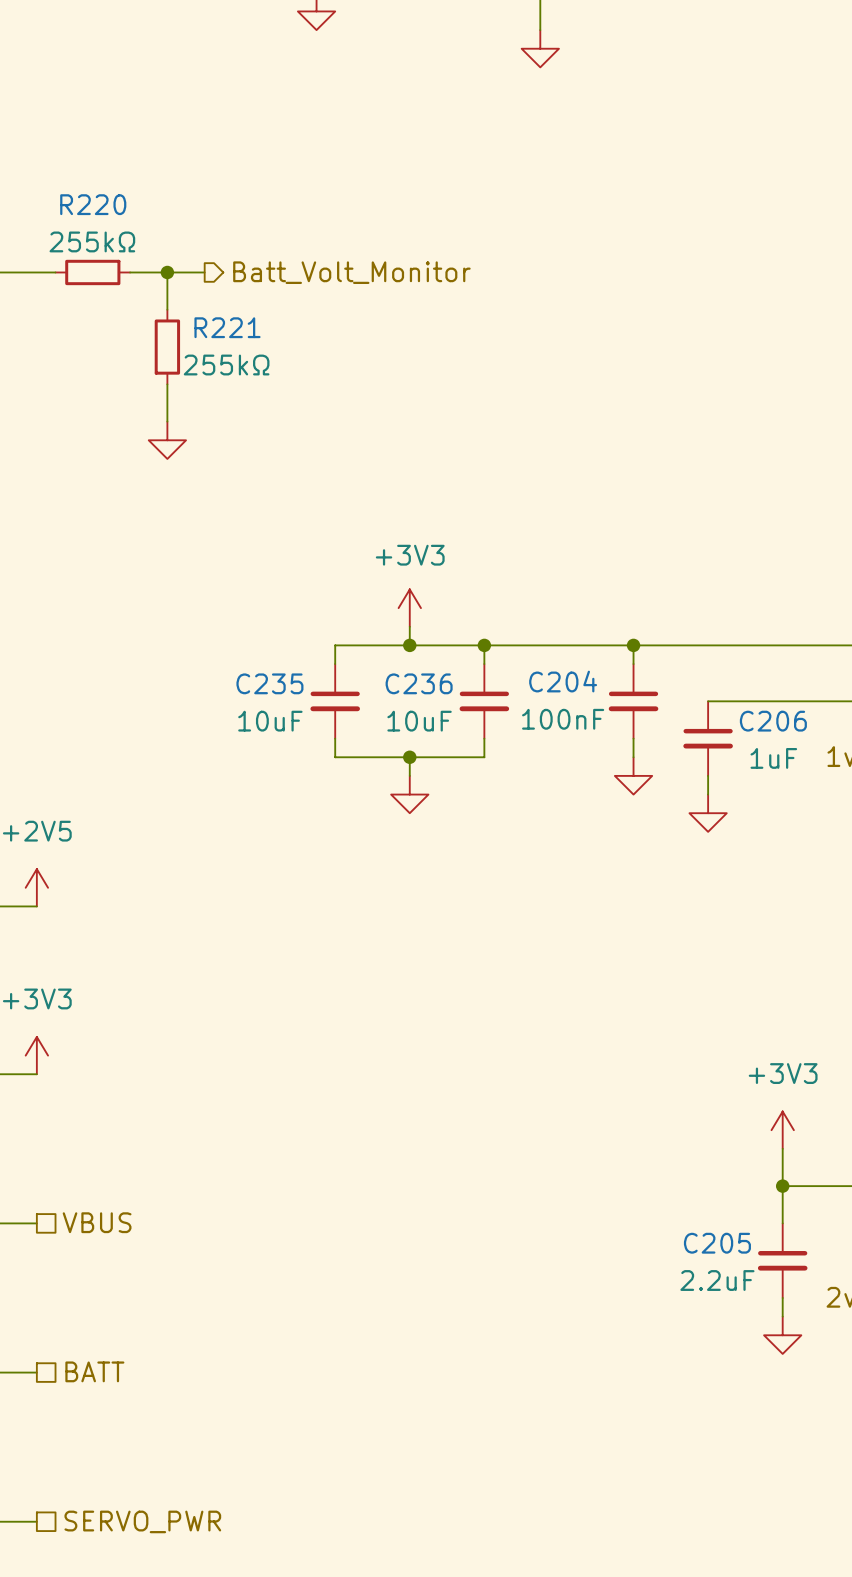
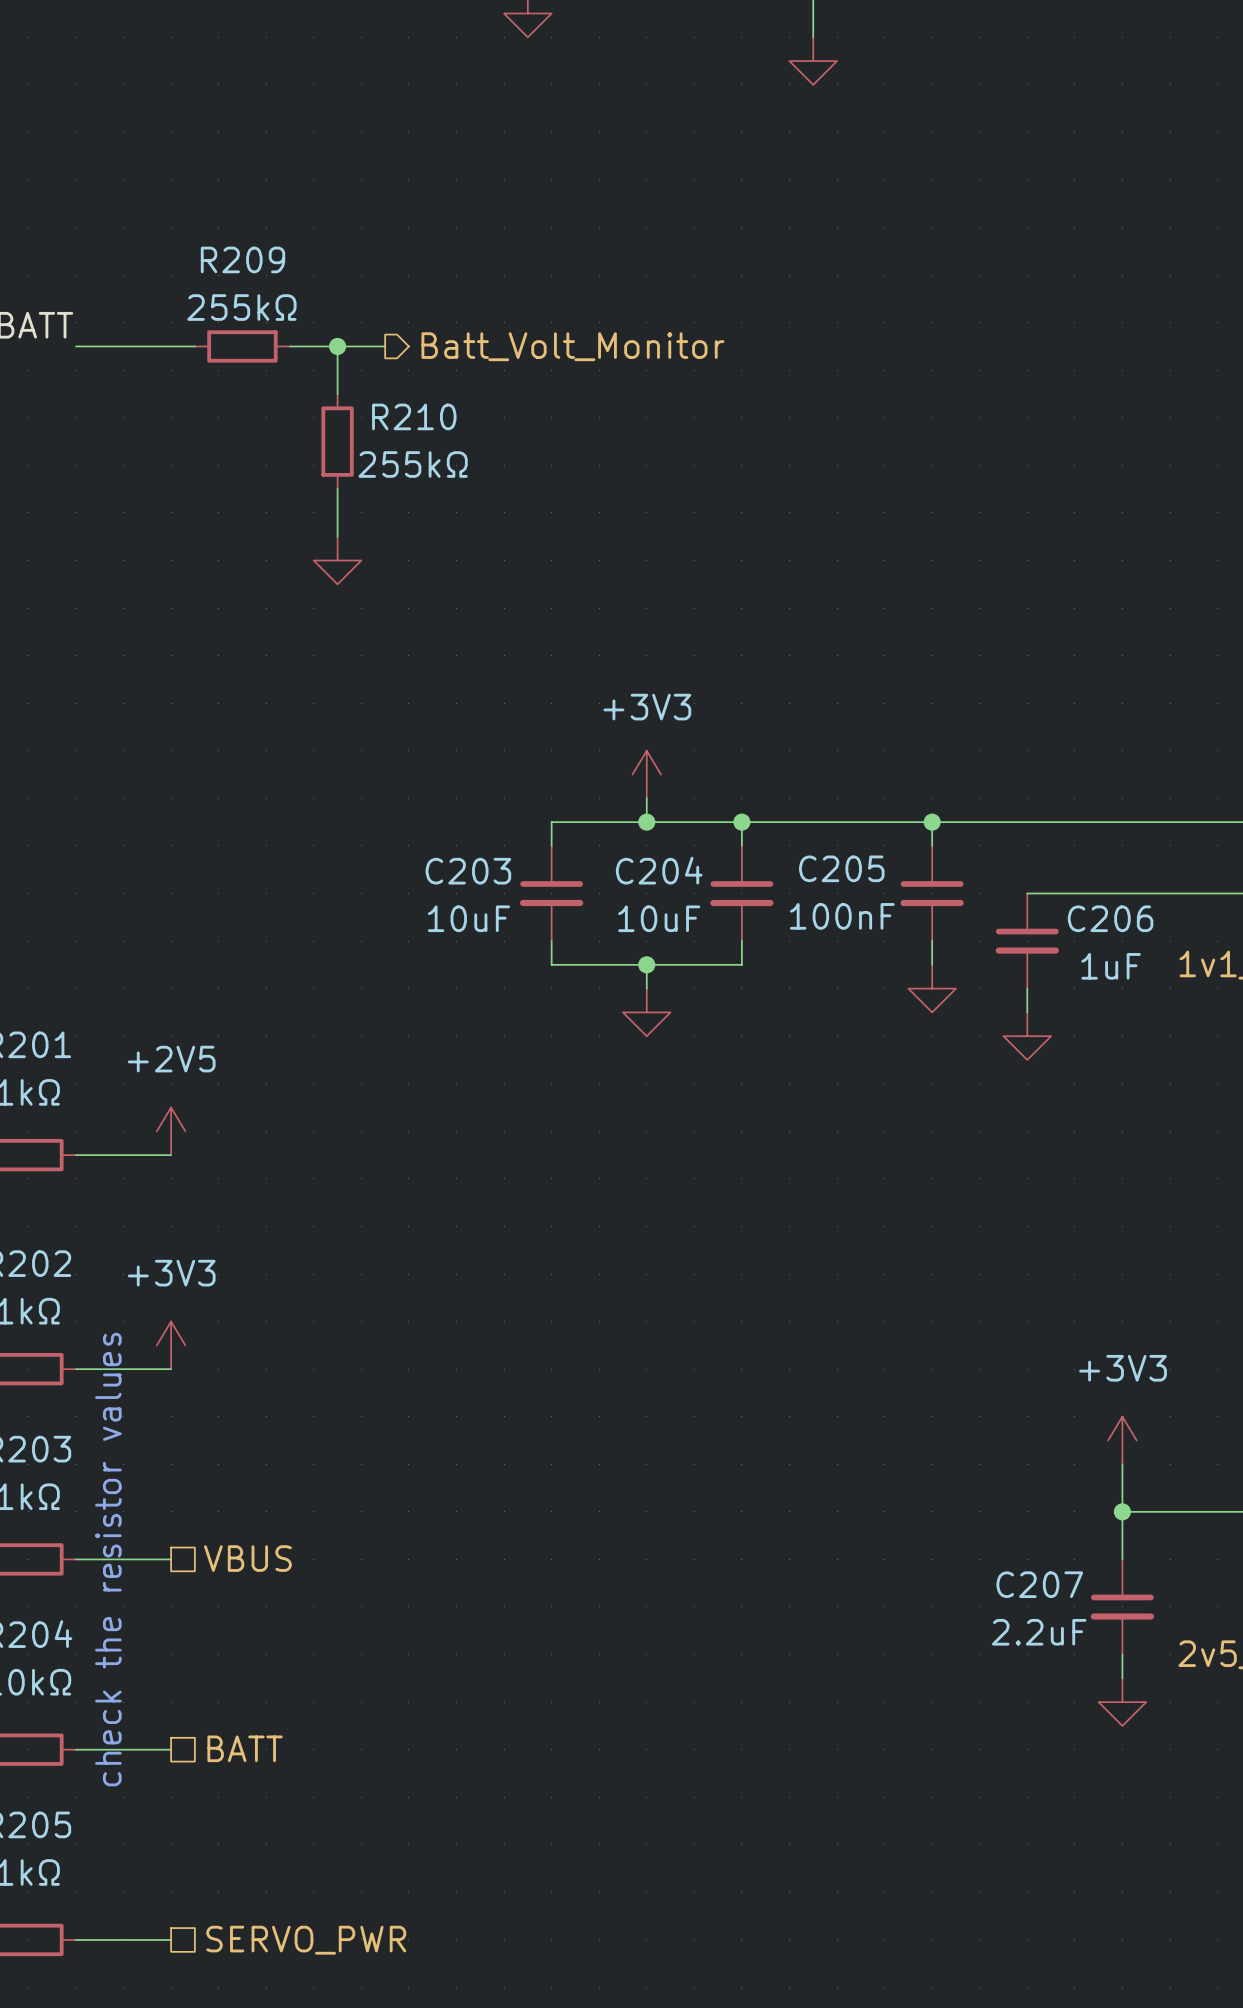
R220 name: R220 (93, 204) -> R209 (243, 259)
R221 name: R221 (227, 327) -> R210 (414, 416)
C204 name: C204 (563, 681) -> C205 (841, 868)
C235 name: C235 (269, 683) -> C203 (468, 871)
C236 name: C236 (419, 683) -> C204 (659, 870)
C205 name: C205 (717, 1243) -> C207 (1039, 1584)

